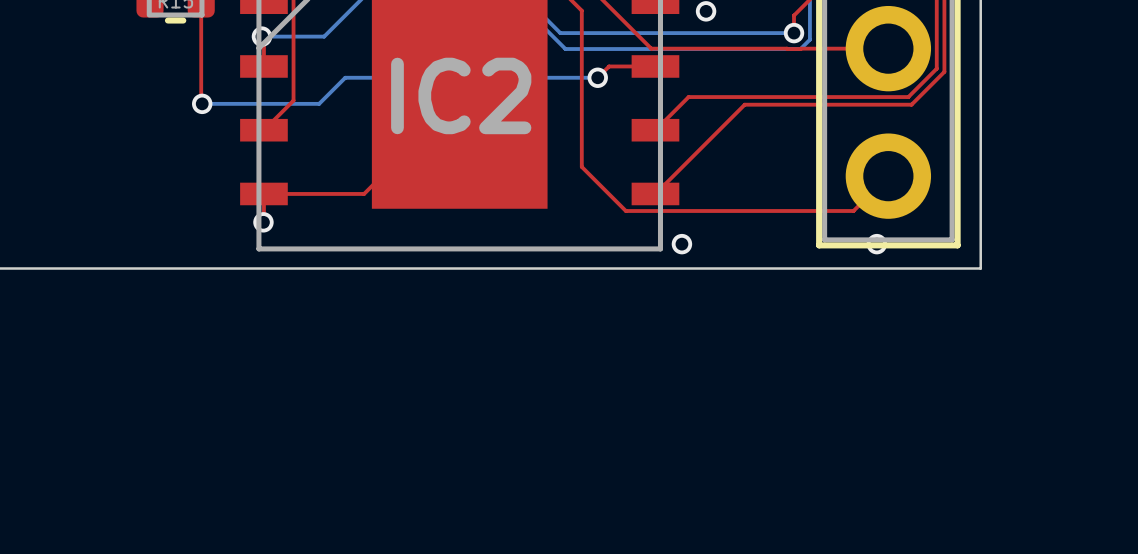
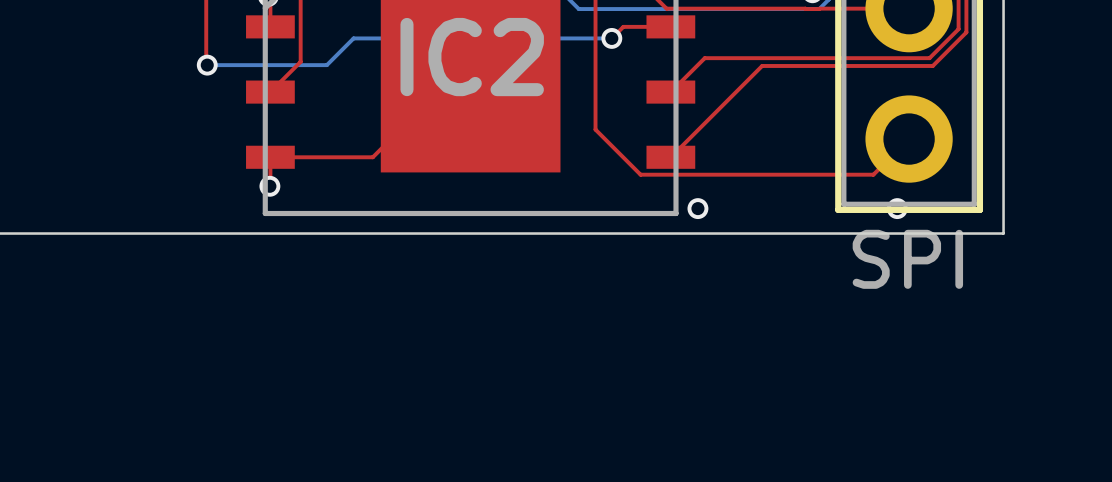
part value: none -> SPI (907, 259)

